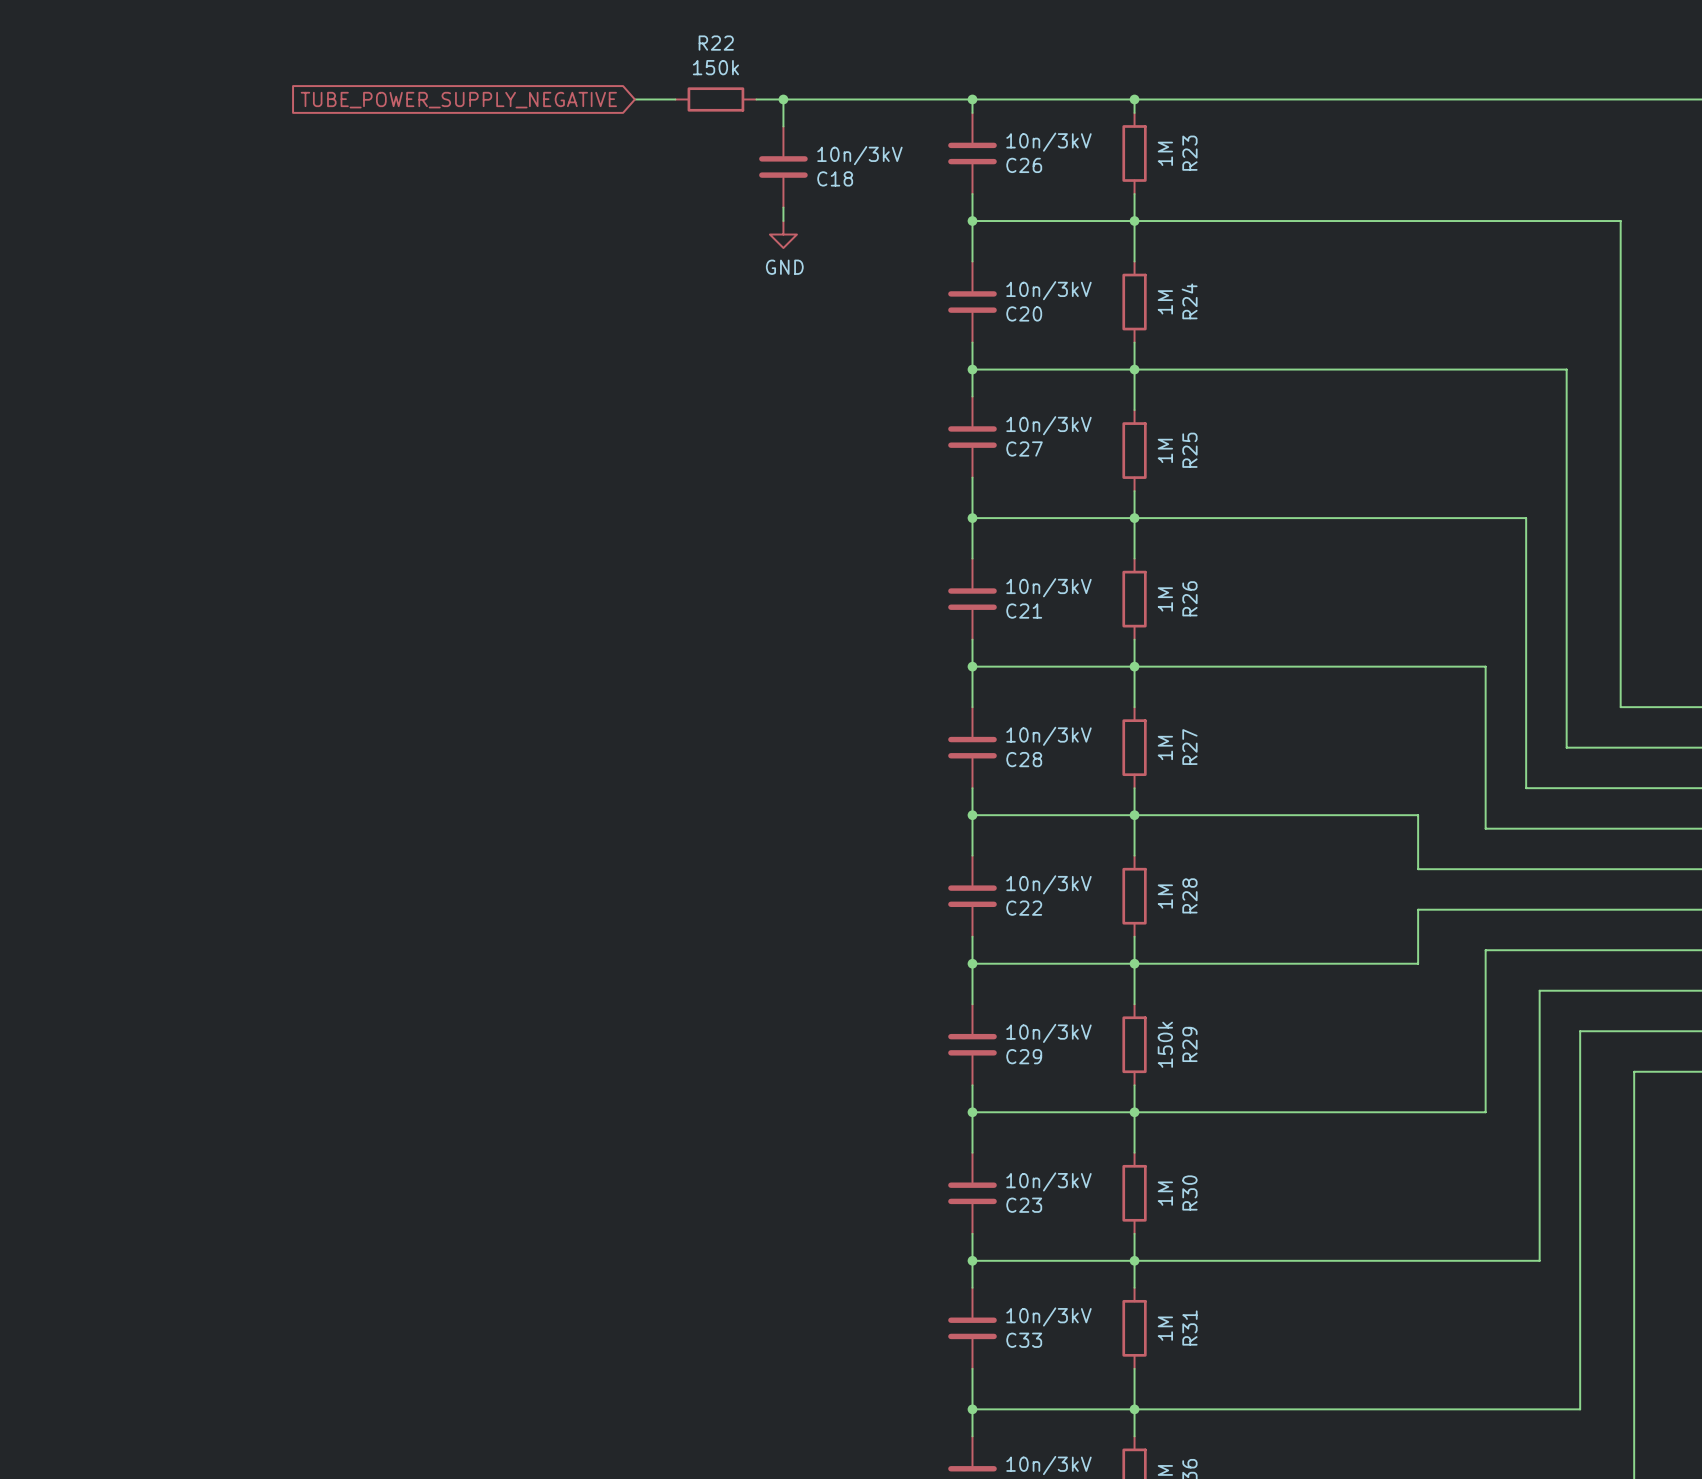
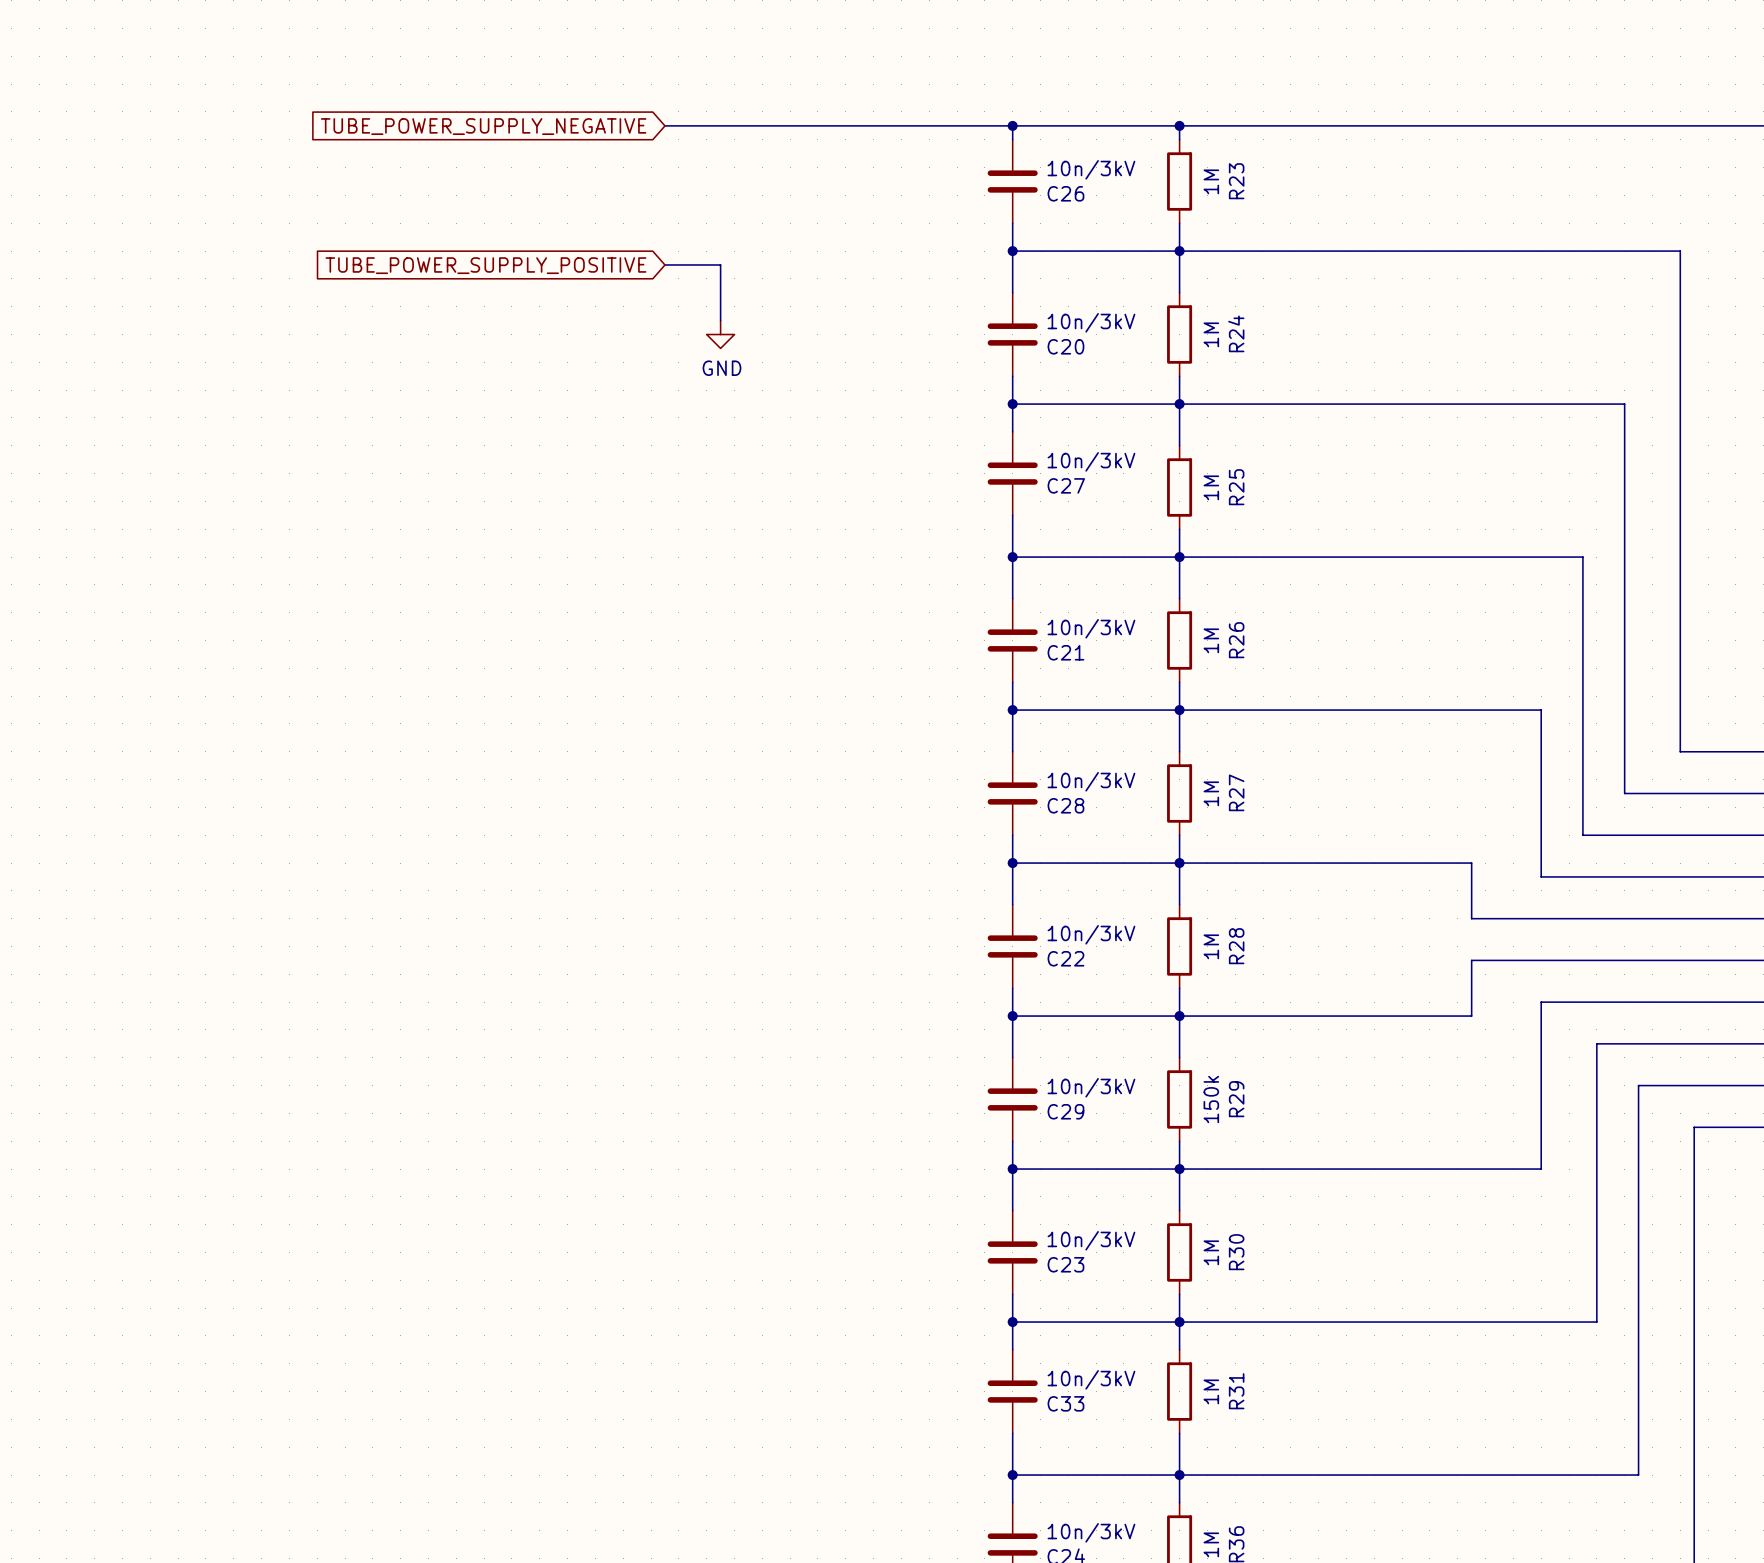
wire: none -> (706, 125) (790, 125)
R22: 150k (715, 99) -> none
wire: (783, 99) (783, 126) -> none
junction: (783, 99) -> none
C18: 10n/3kV (783, 167) -> none
wire: (783, 207) (783, 221) -> none
wire: none -> (664, 264) (720, 264) (720, 320)
power symbol position: GND (783, 234) -> GND (720, 334)
global label: none -> TUBE_POWER_SUPPLY_POSITIVE (485, 265)

